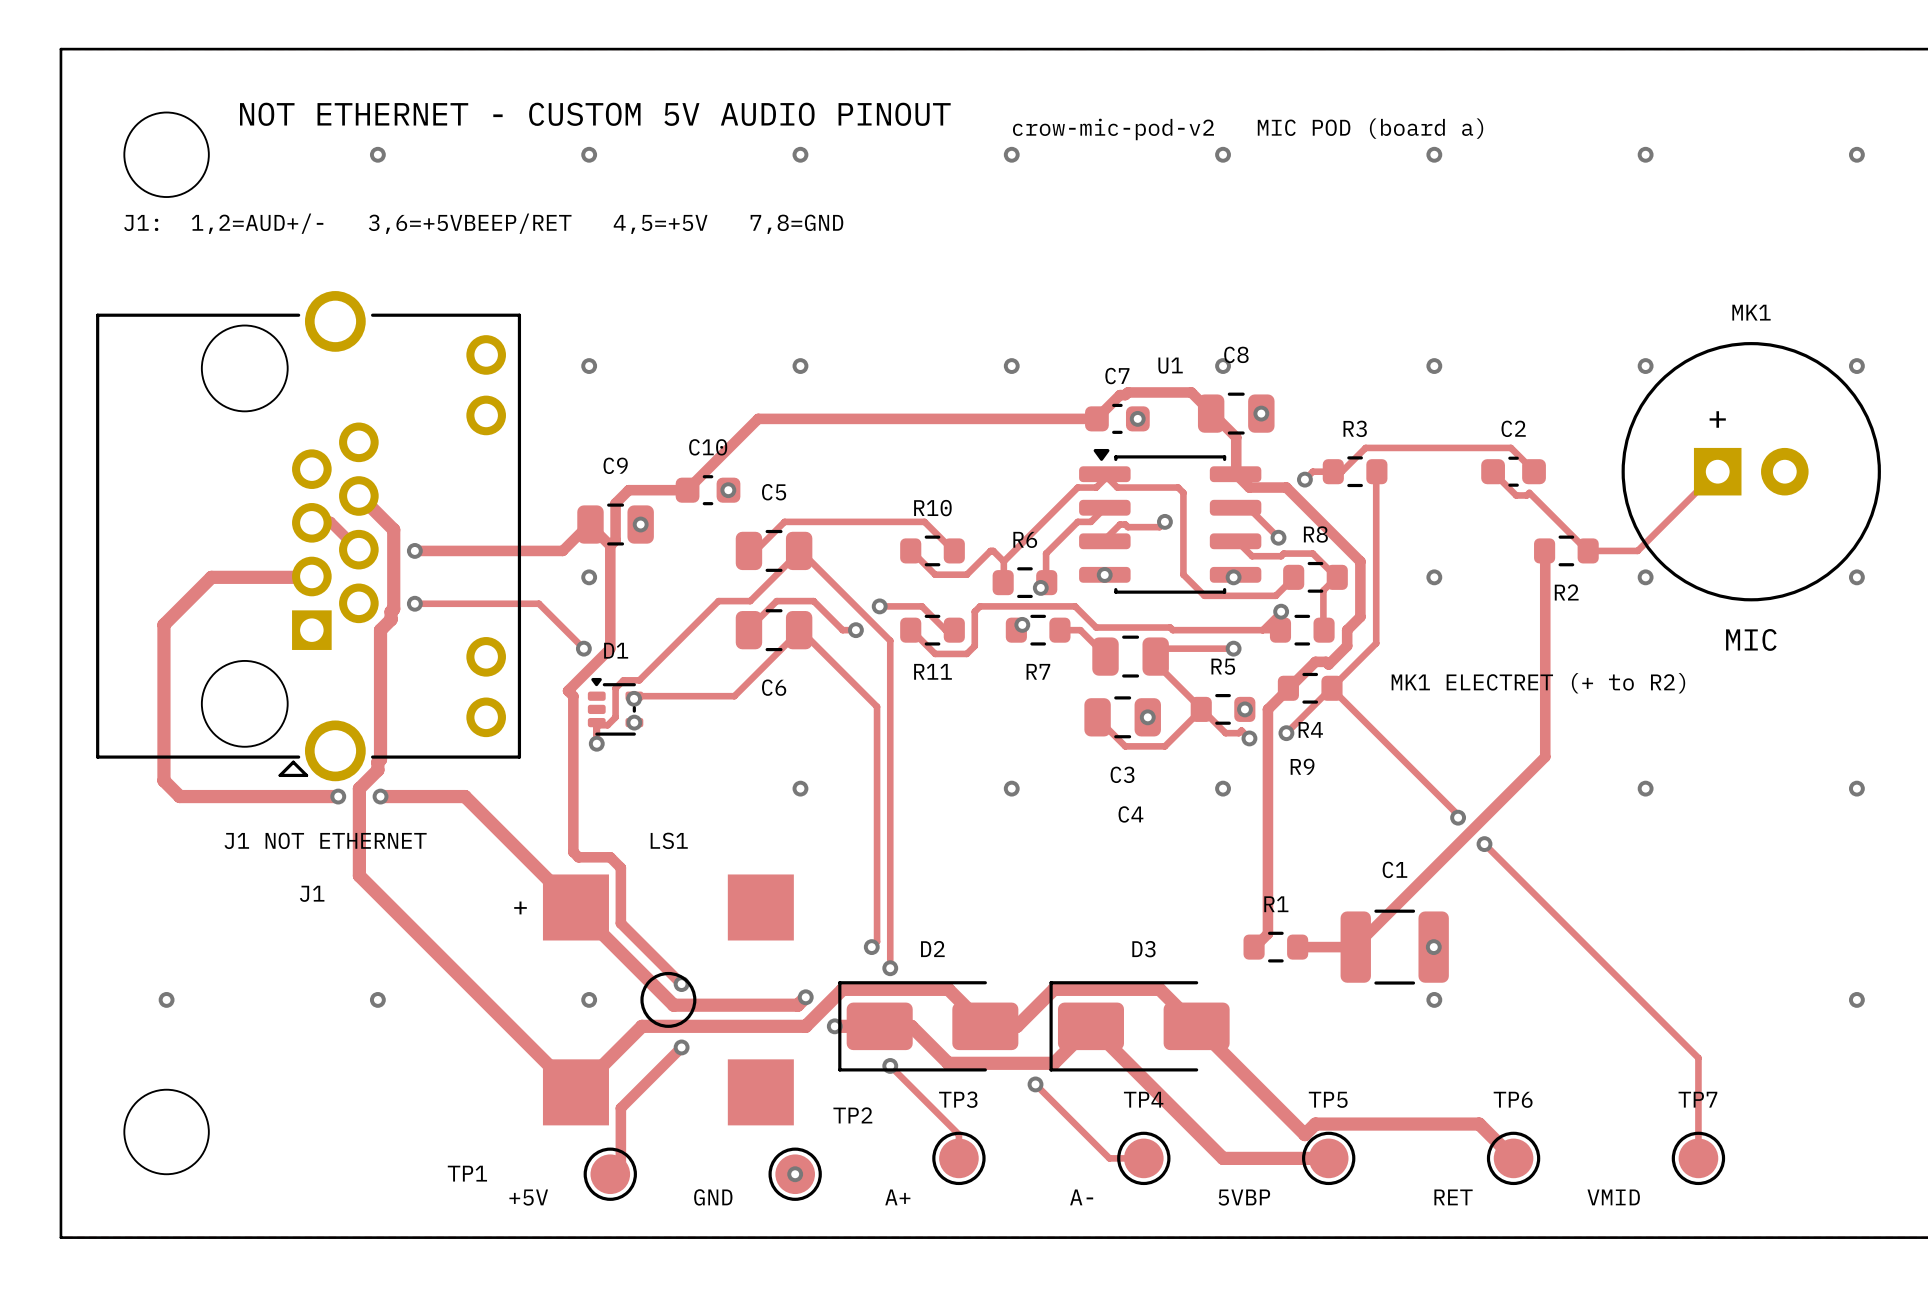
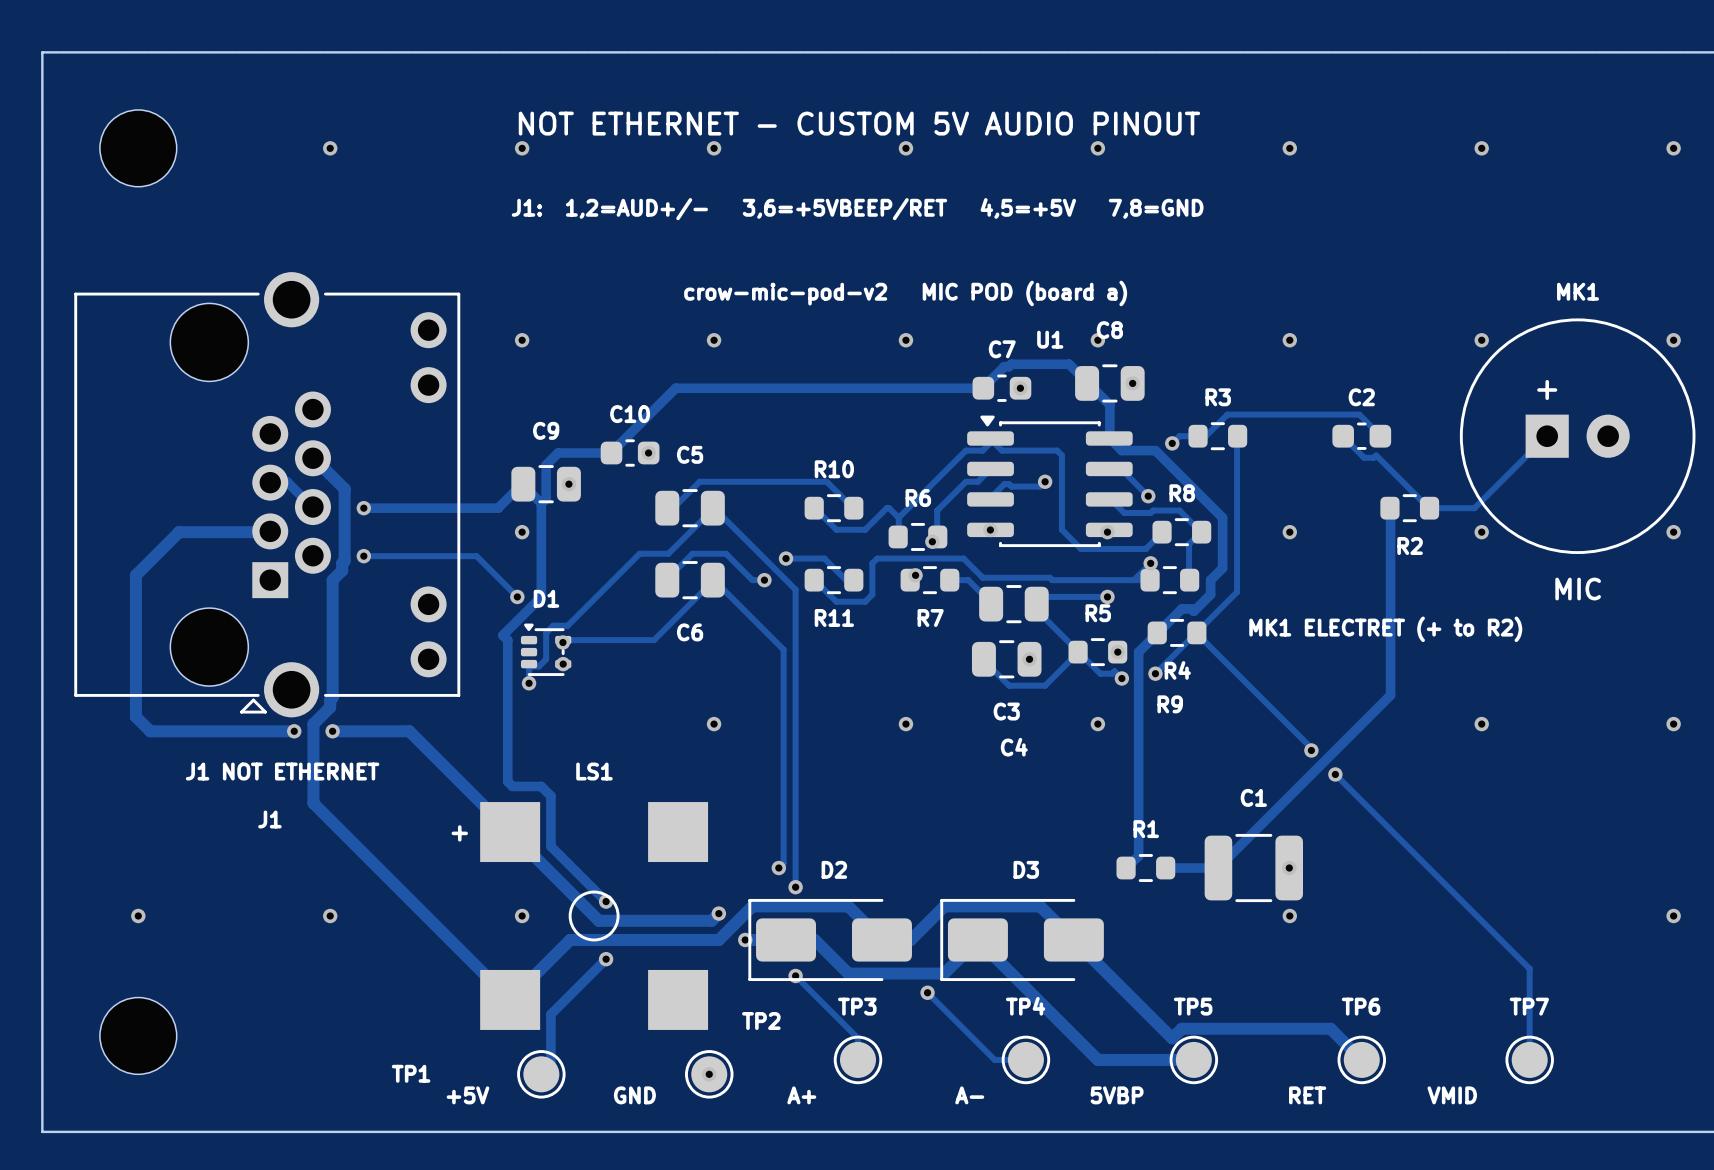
text position: NOT ETHERNET - CUSTOM 5V AUDIO PINOUT (595, 114) -> NOT ETHERNET - CUSTOM 5V AUDIO PINOUT (859, 123)
text position: crow-mic-pod-v2 MIC POD (board a) (1248, 129) -> crow-mic-pod-v2 MIC POD (board a) (905, 293)
text position: J1: 1,2=AUD+/- 3,6=+5VBEEP/RET 4,5=+5V 7,8=GND (483, 223) -> J1: 1,2=AUD+/- 3,6=+5VBEEP/RET 4,5=+5V 7,8=GND (857, 209)

